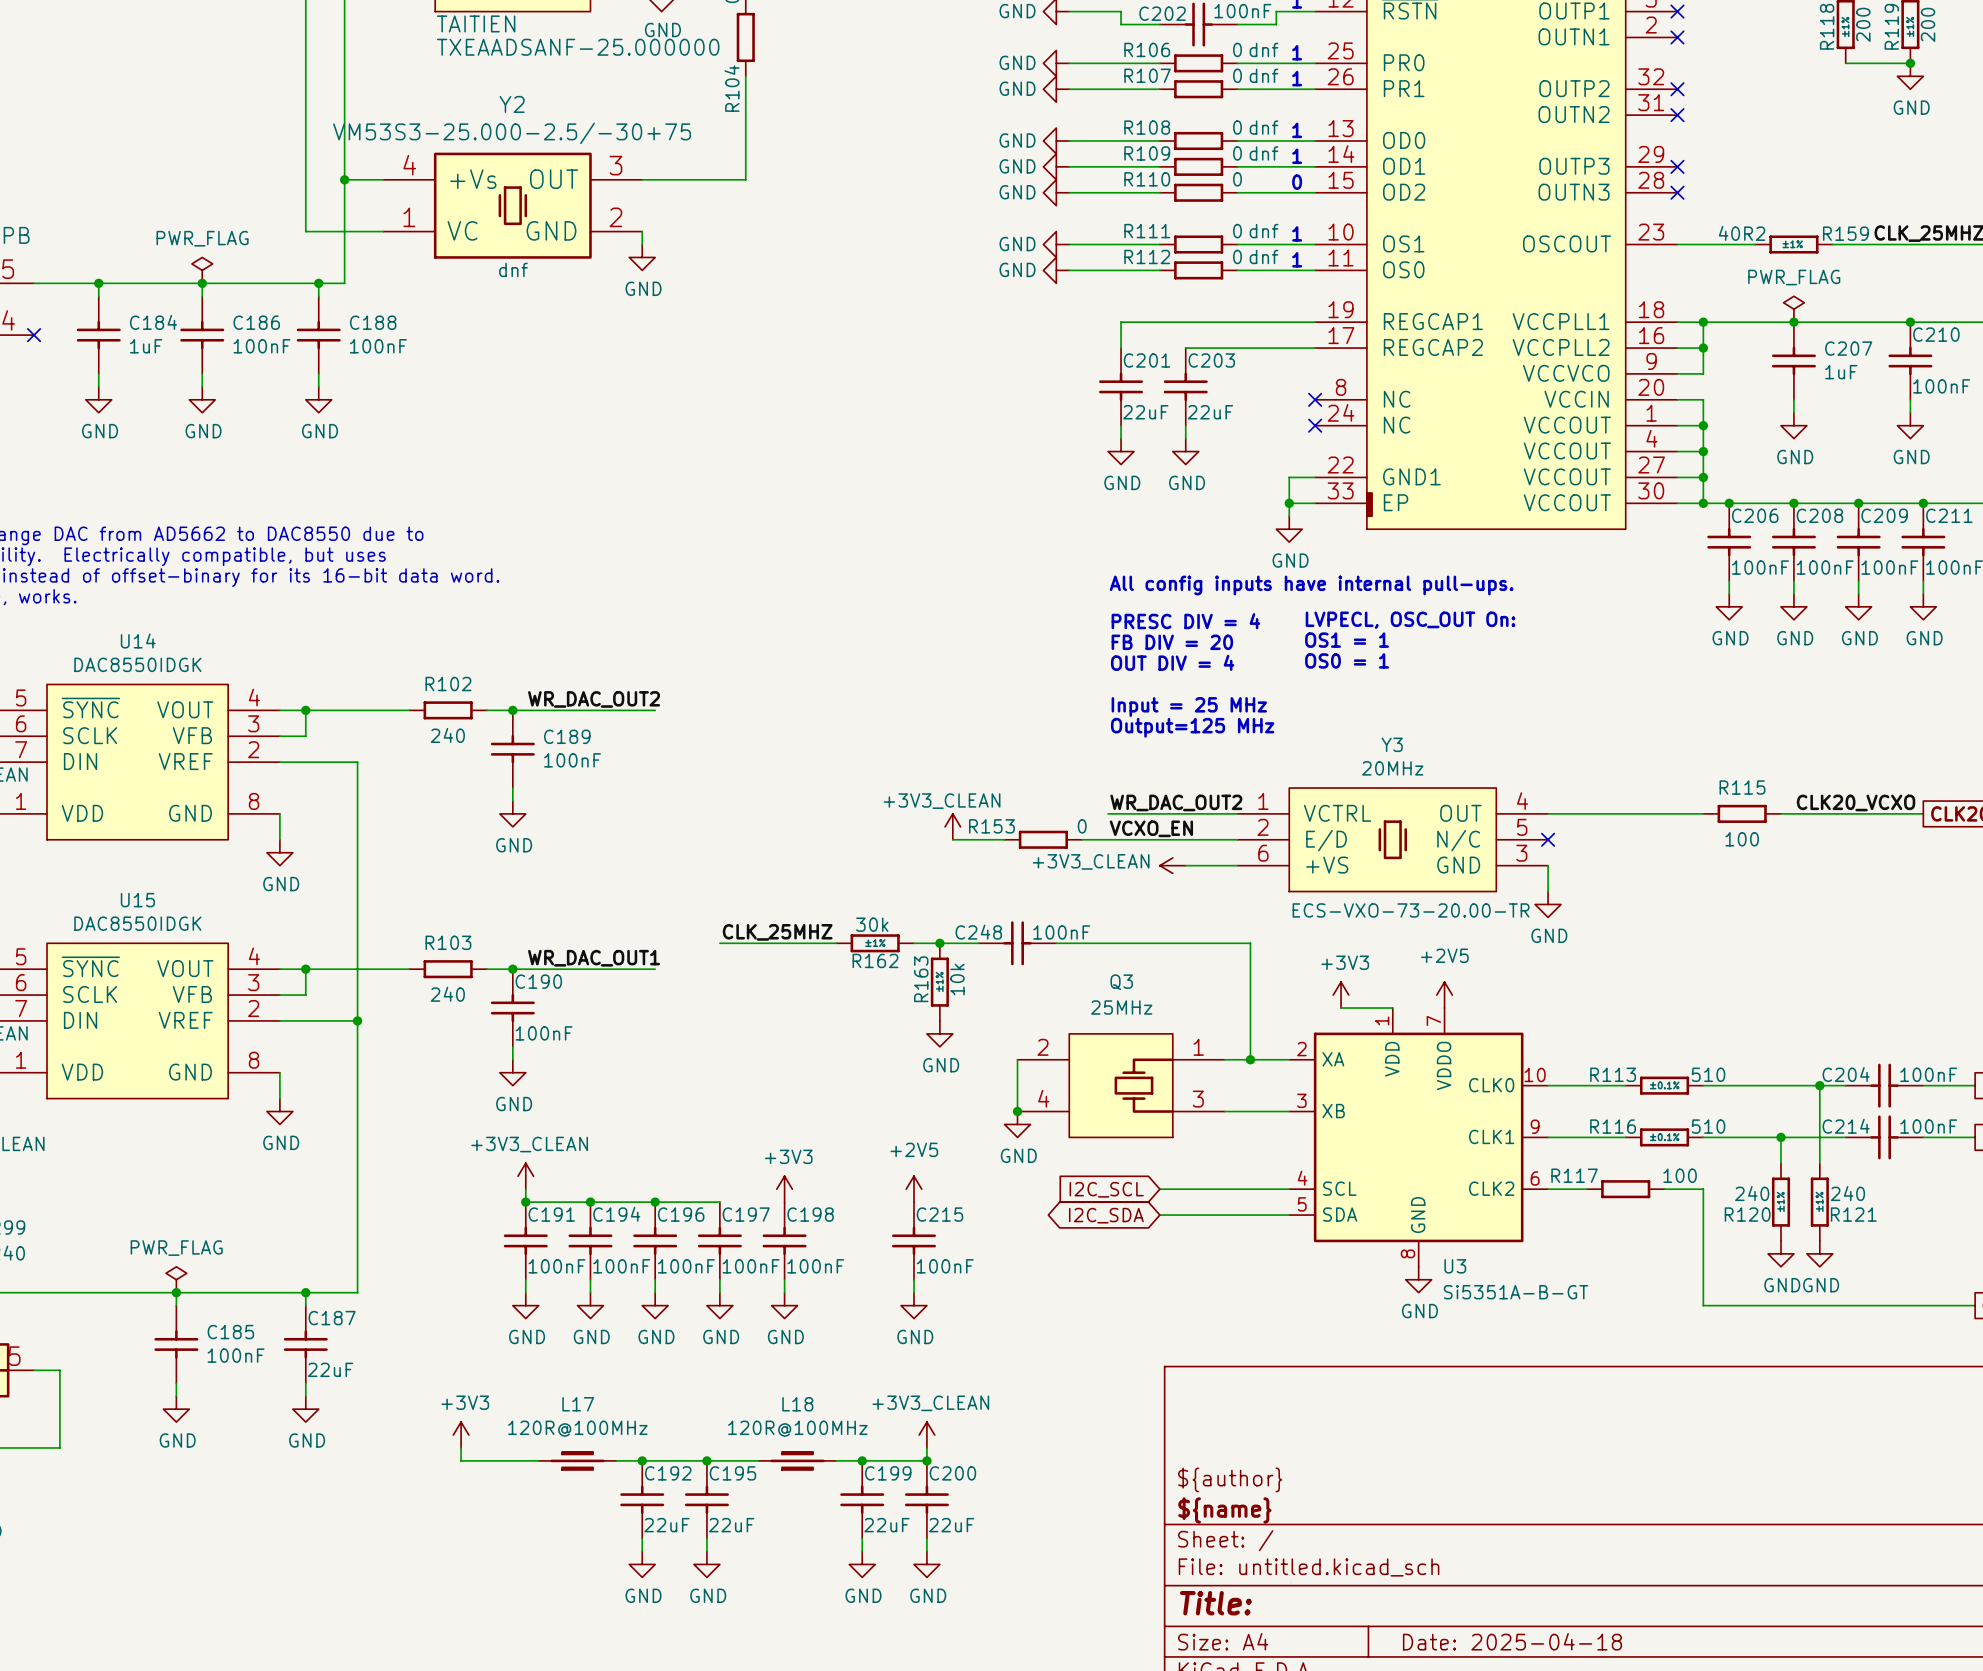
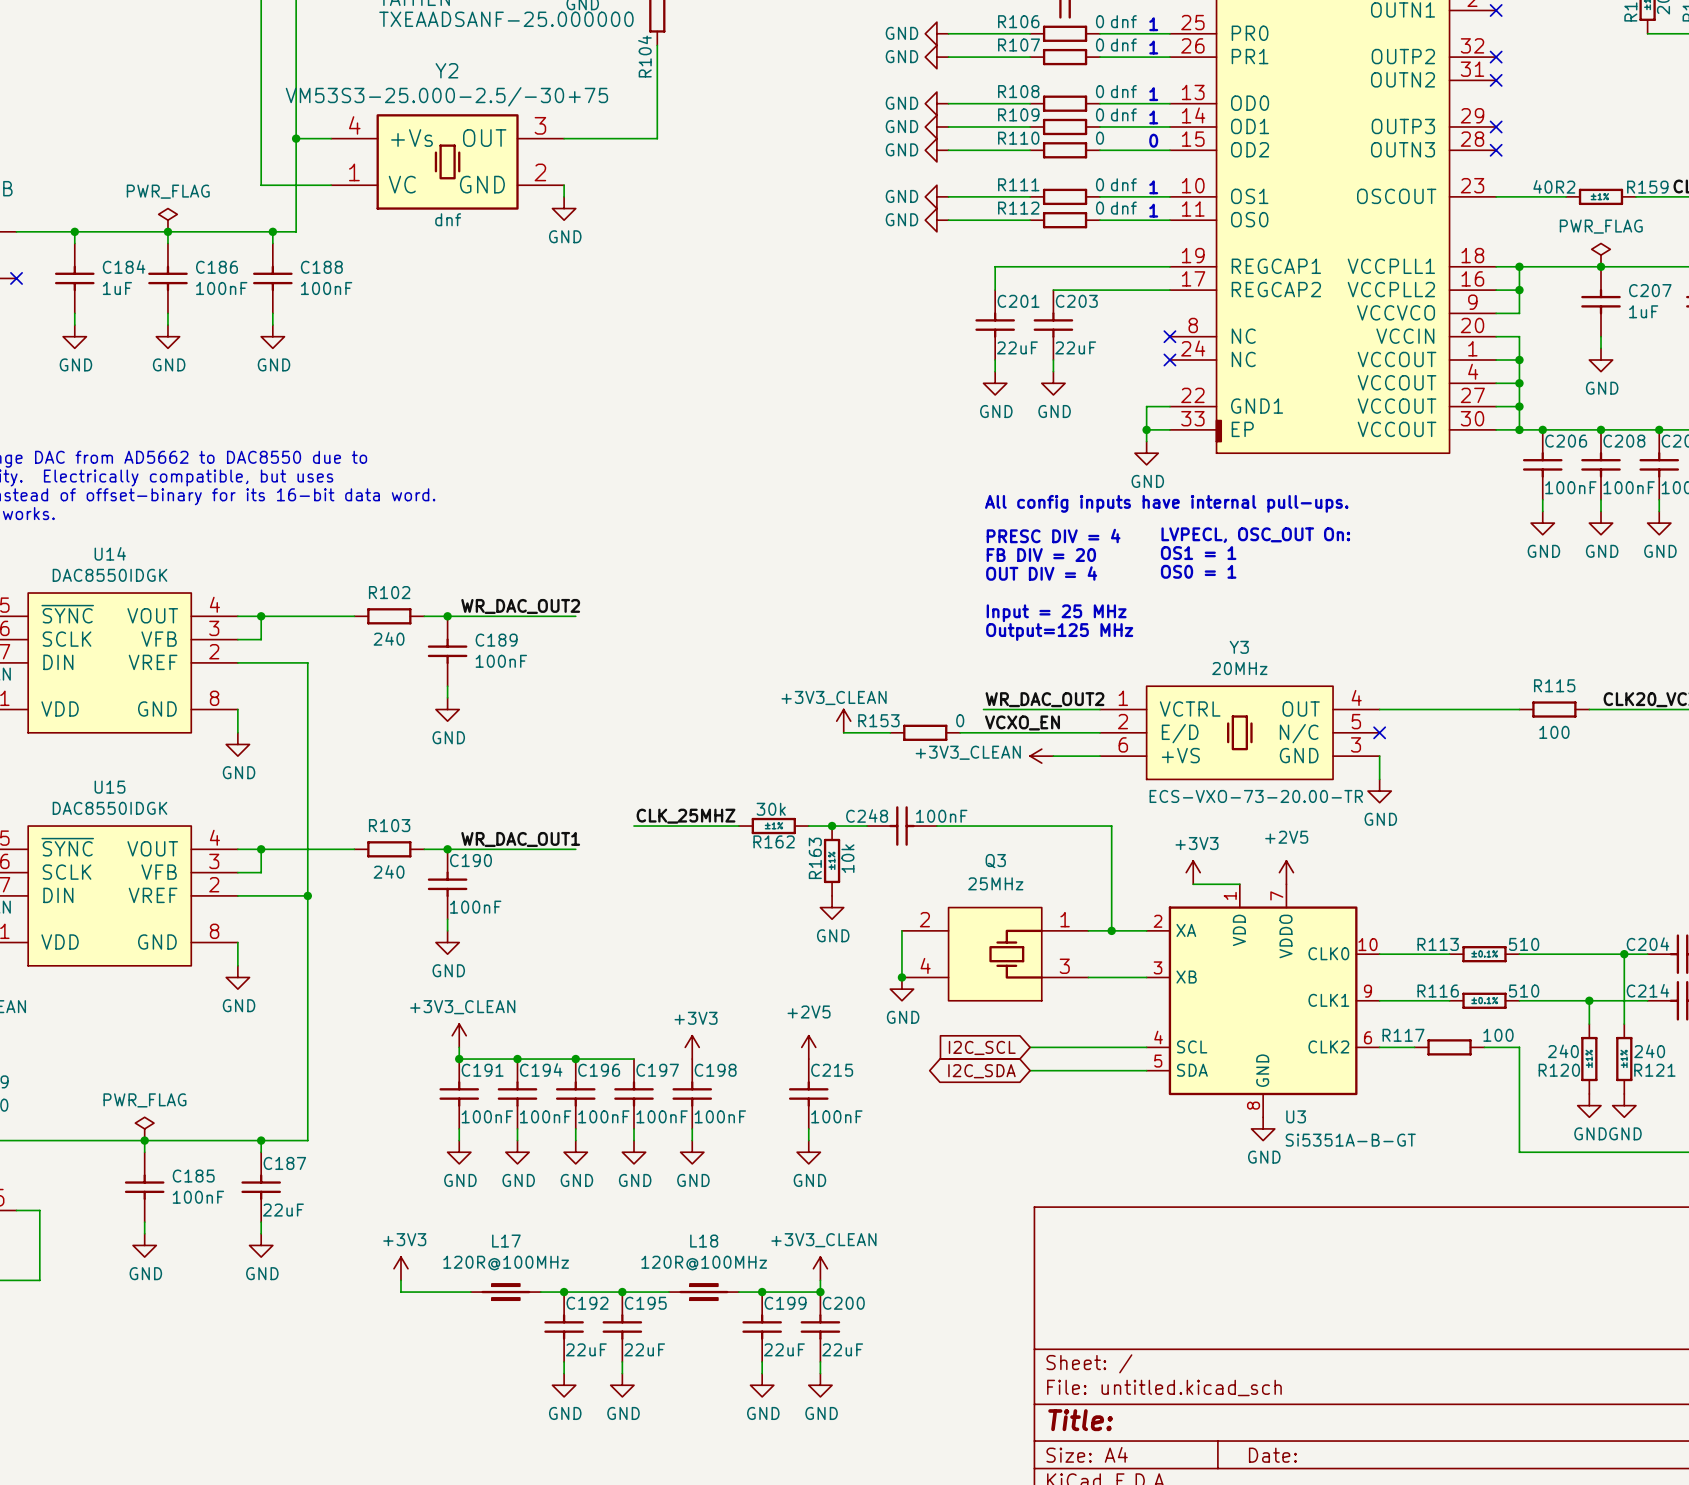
title block: ${author} (1230, 1479) -> none
title block: ${name} (1224, 1510) -> none
title block: Date: 2025-04-18 (1512, 1641) -> Date: (1272, 1455)

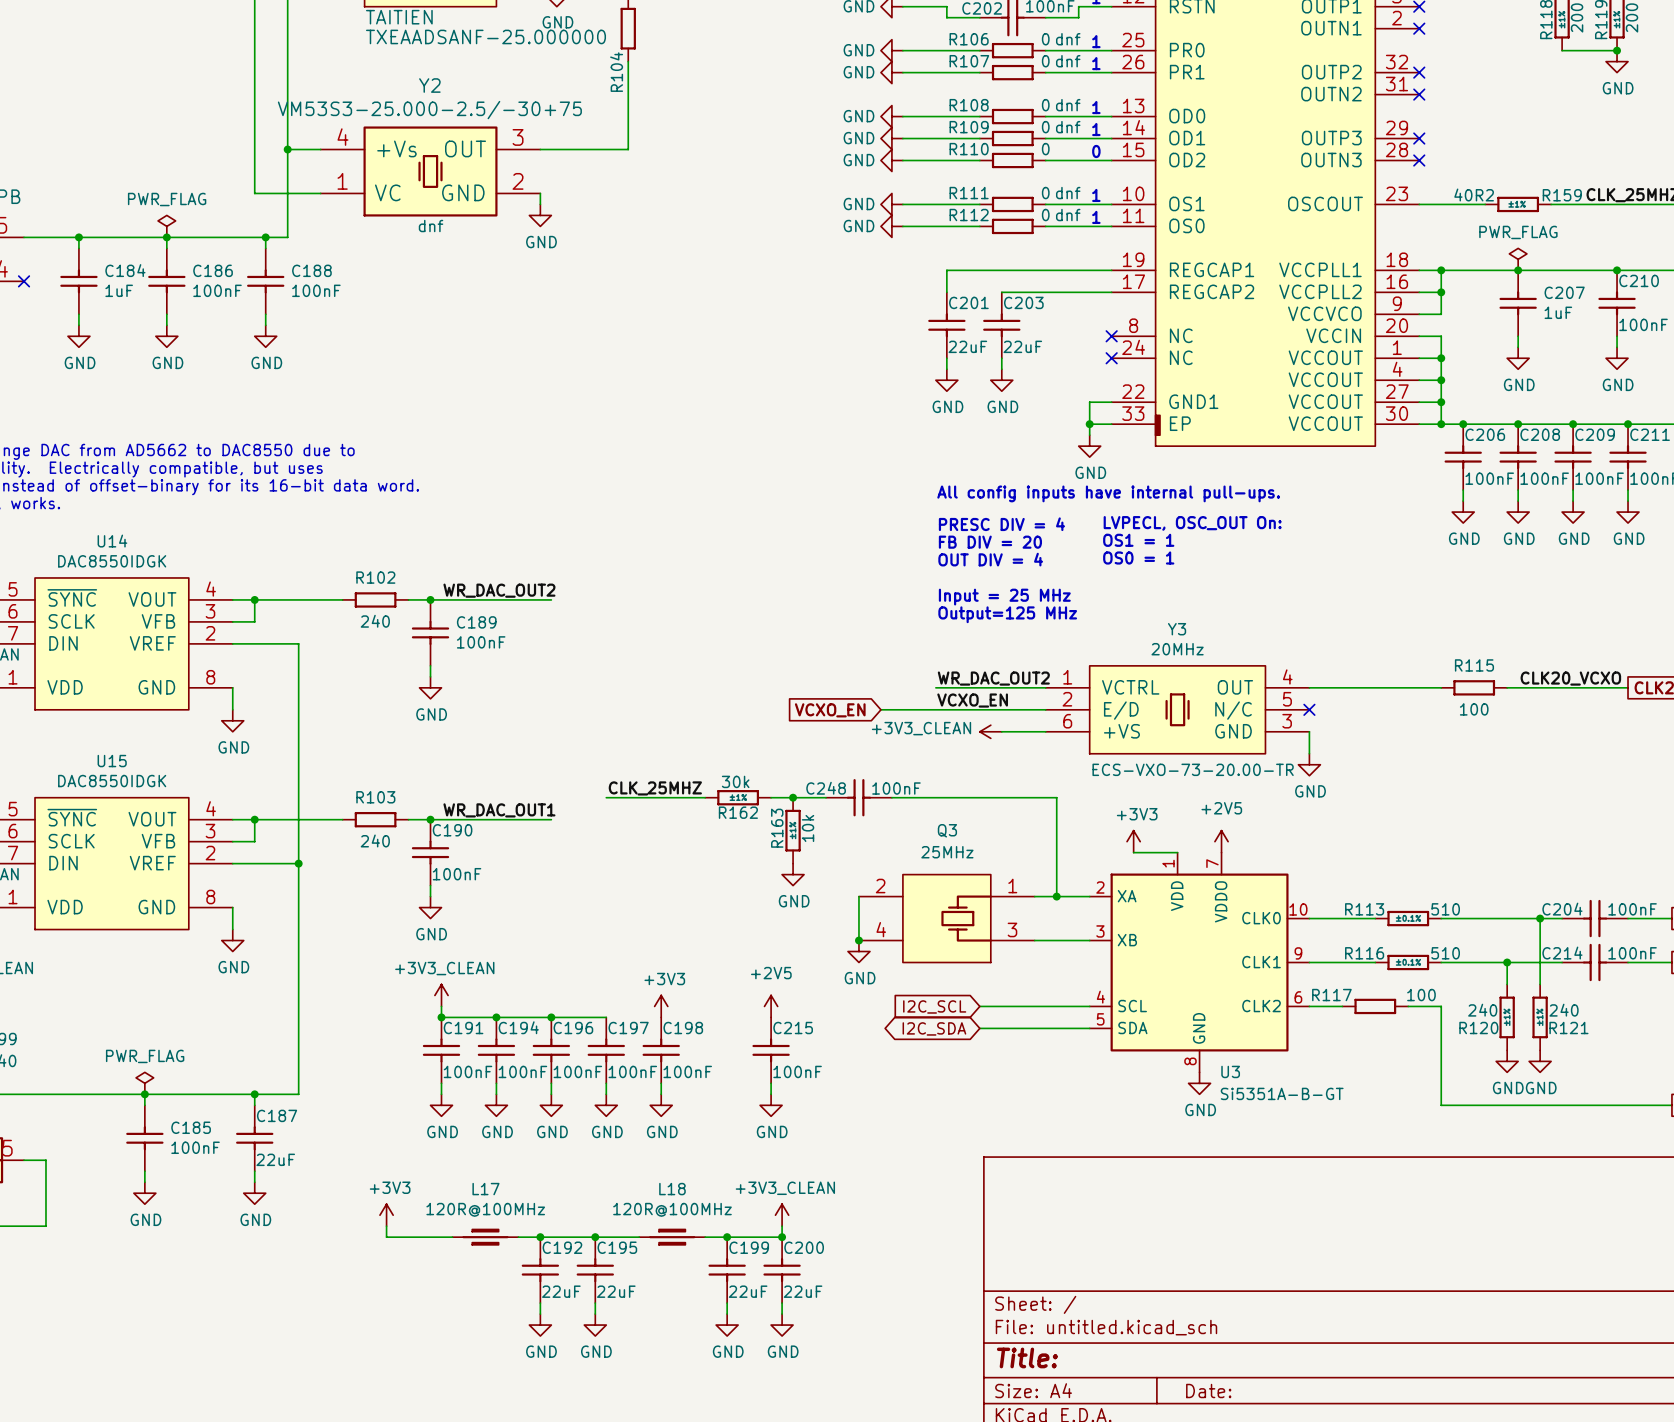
power symbol: +3V3_CLEAN (843, 721) -> none
wire: (843, 732) (890, 732) -> none
wire: none -> (880, 709) (913, 709)
R153: (925, 732) -> none
global label: none -> VCXO_EN (830, 710)

